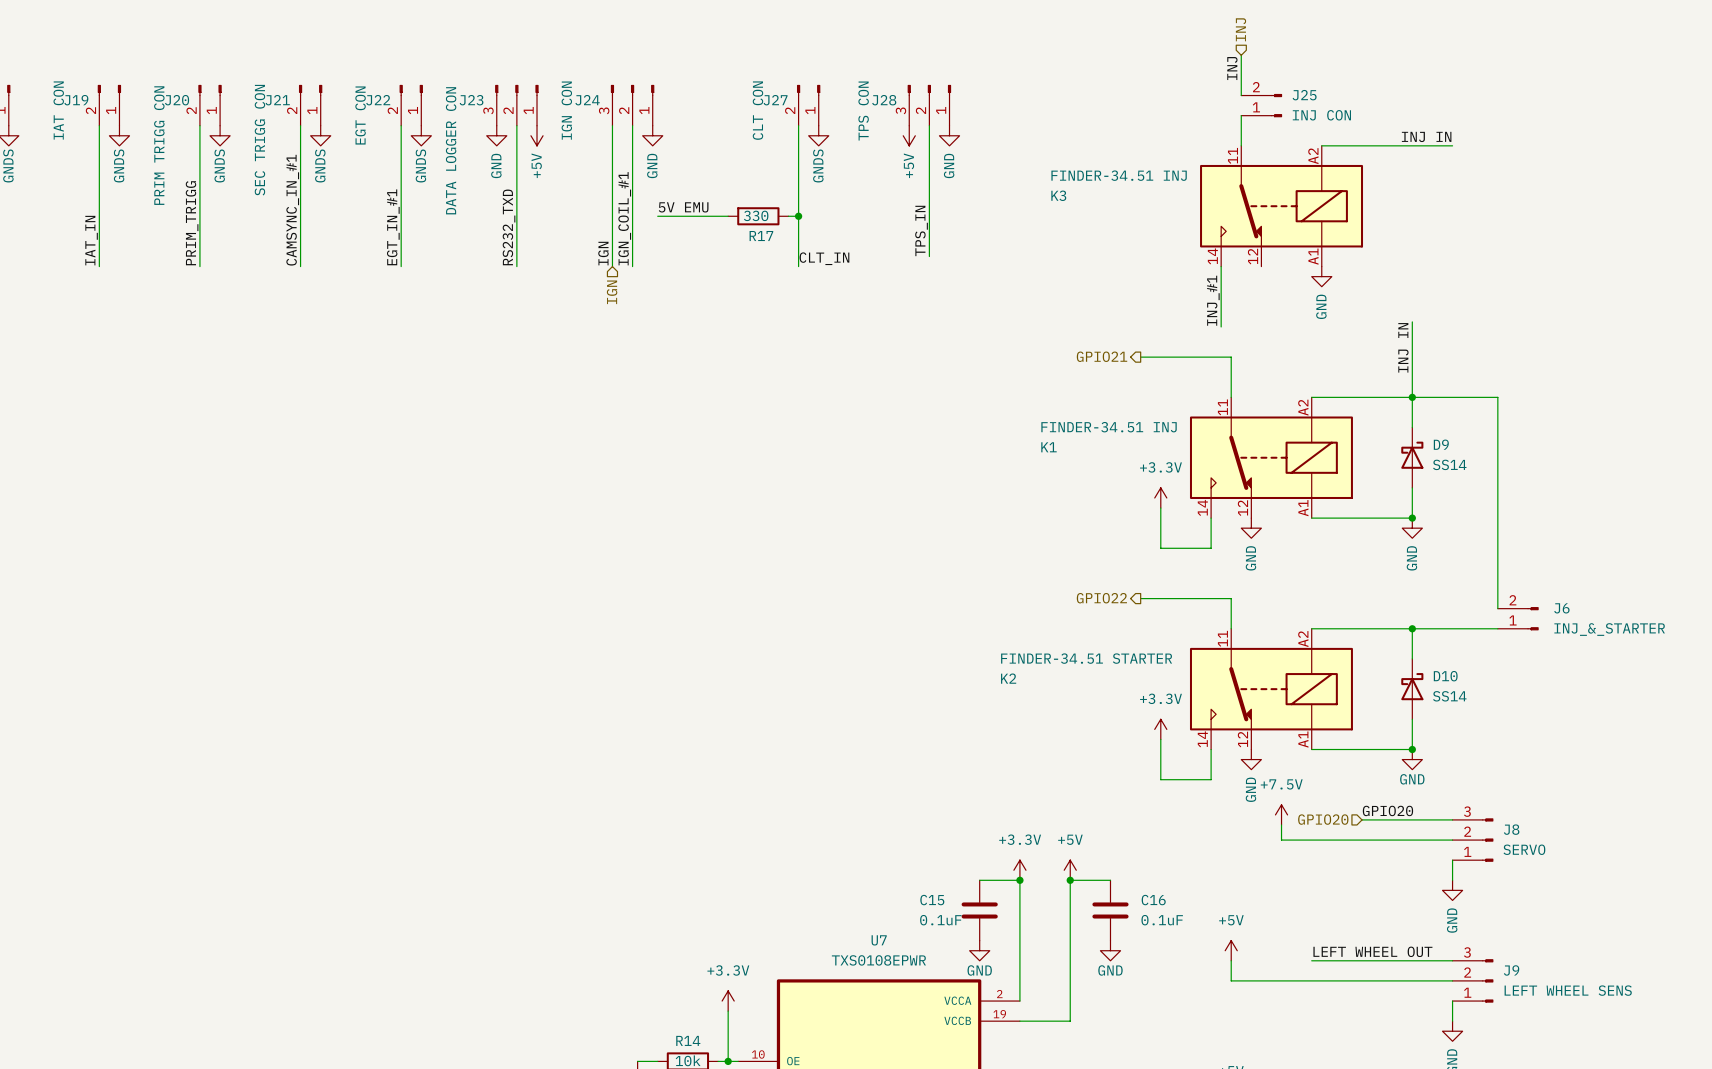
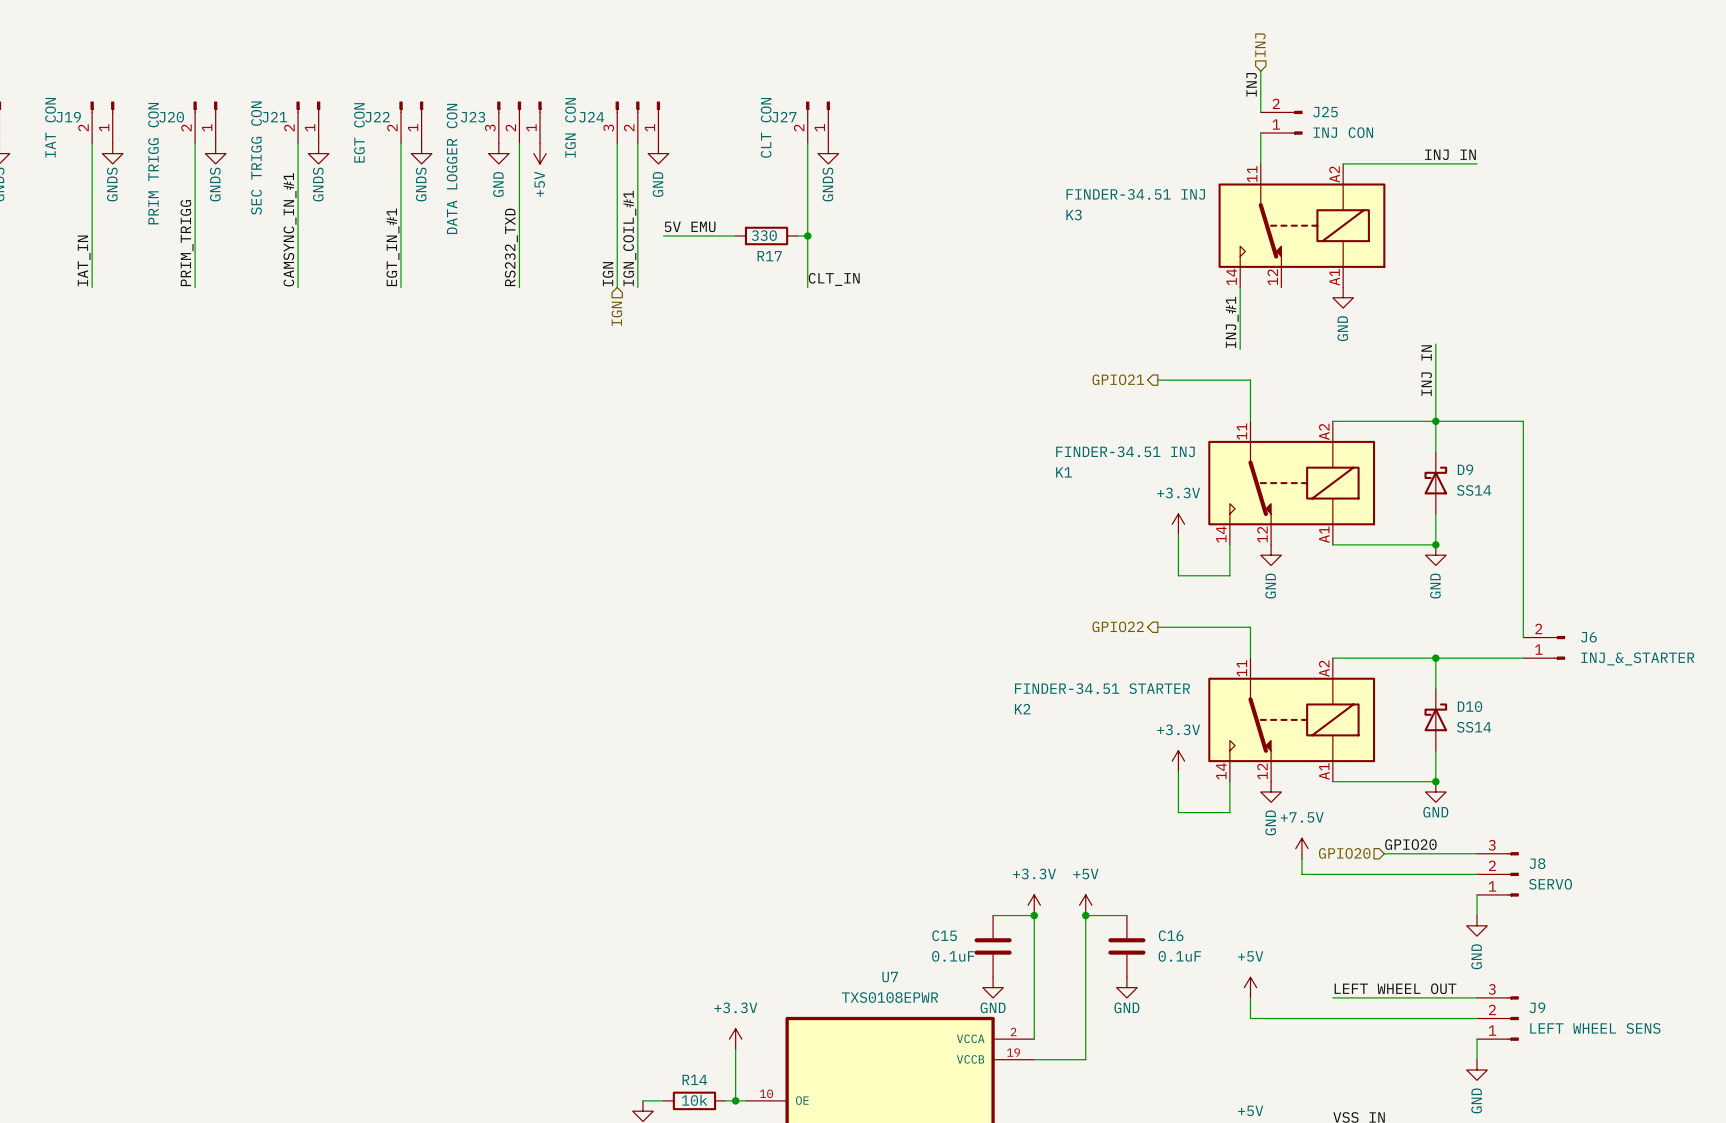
J28: TPS CON (929, 105) -> none
wire: (929, 125) (929, 256) -> none
power symbol: +5V (909, 135) -> none
power symbol: GND (949, 135) -> none
label: TPS_IN (921, 230) -> none

